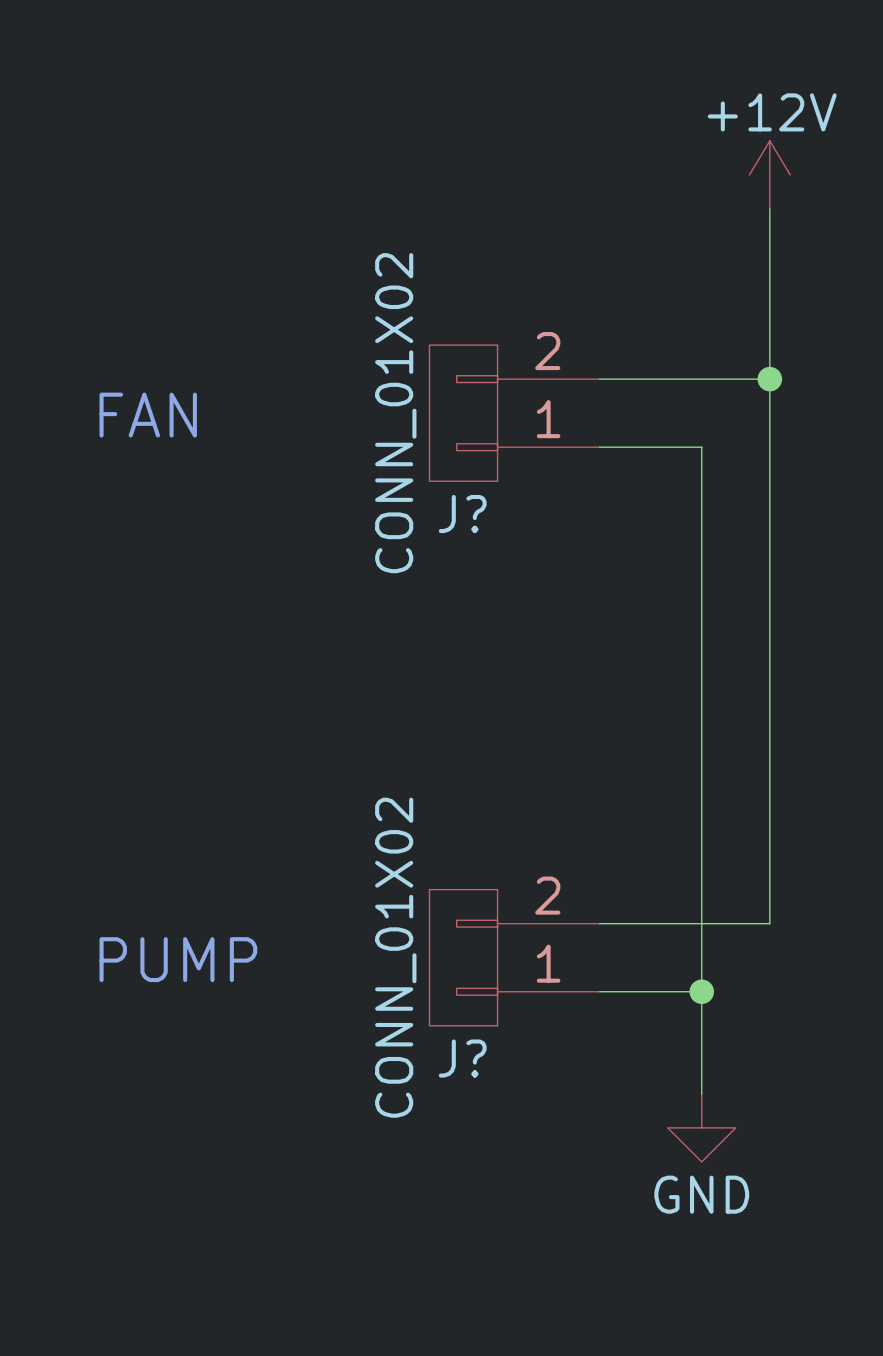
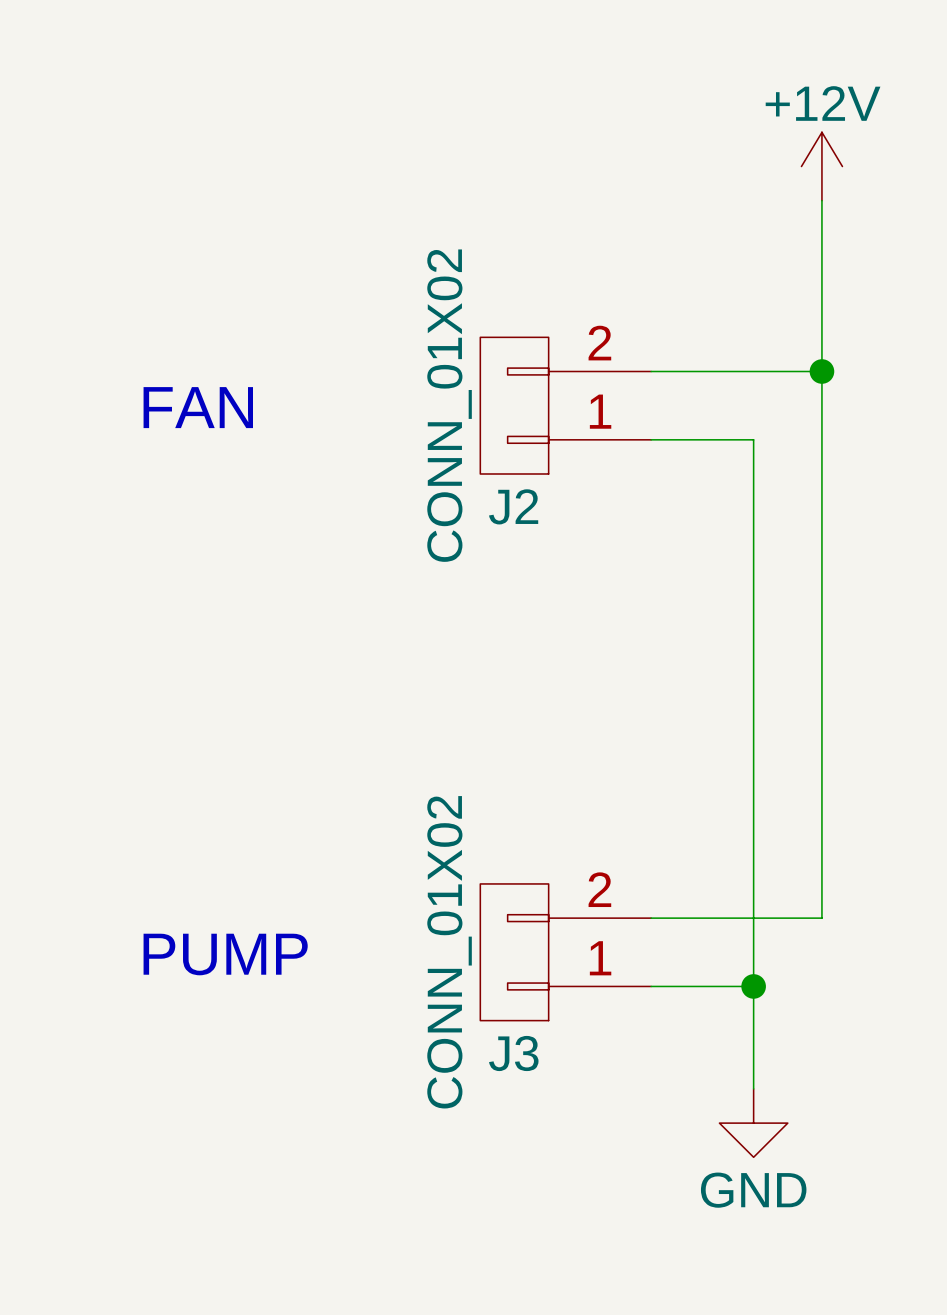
J? name: J? (462, 513) -> J2 (513, 506)
J? name: J? (462, 1058) -> J3 (513, 1053)

